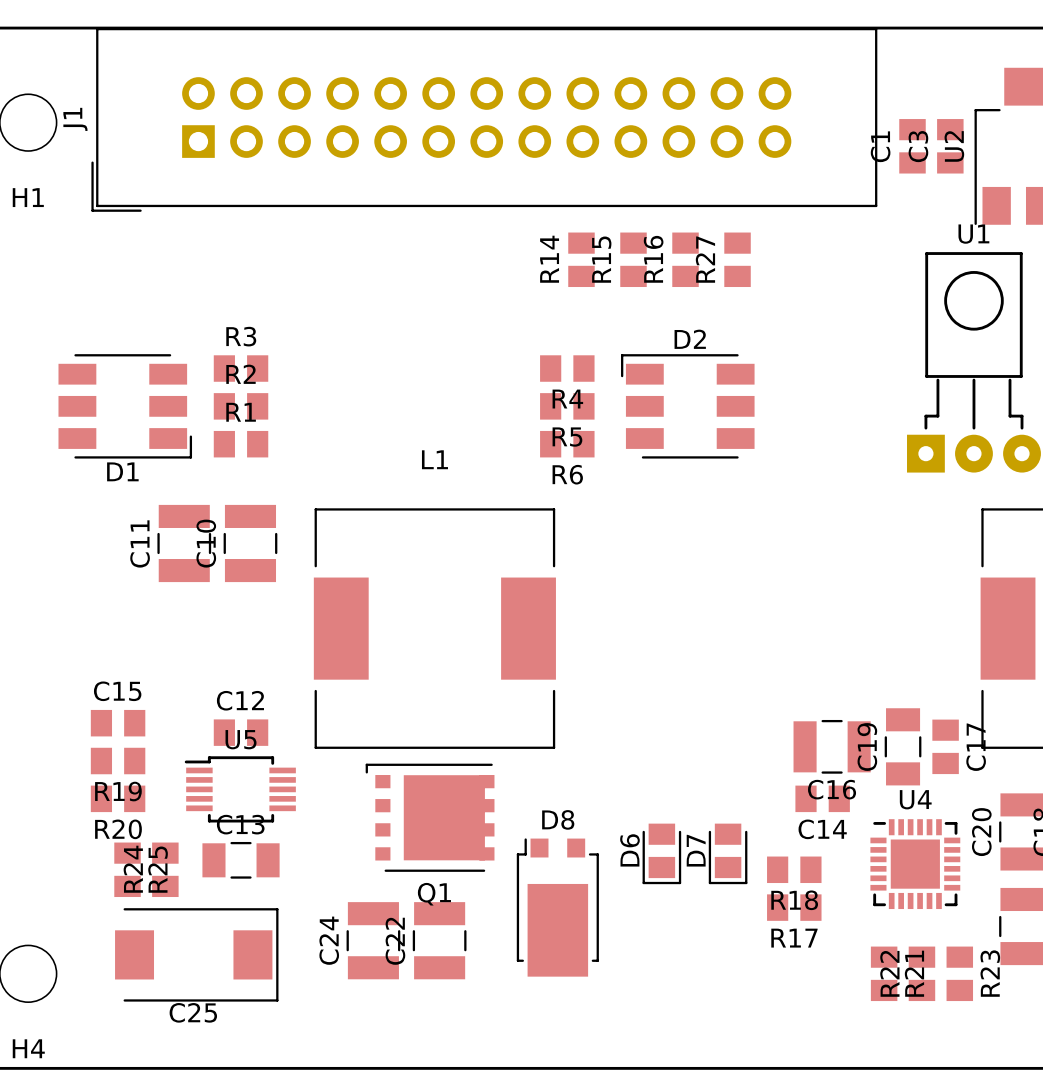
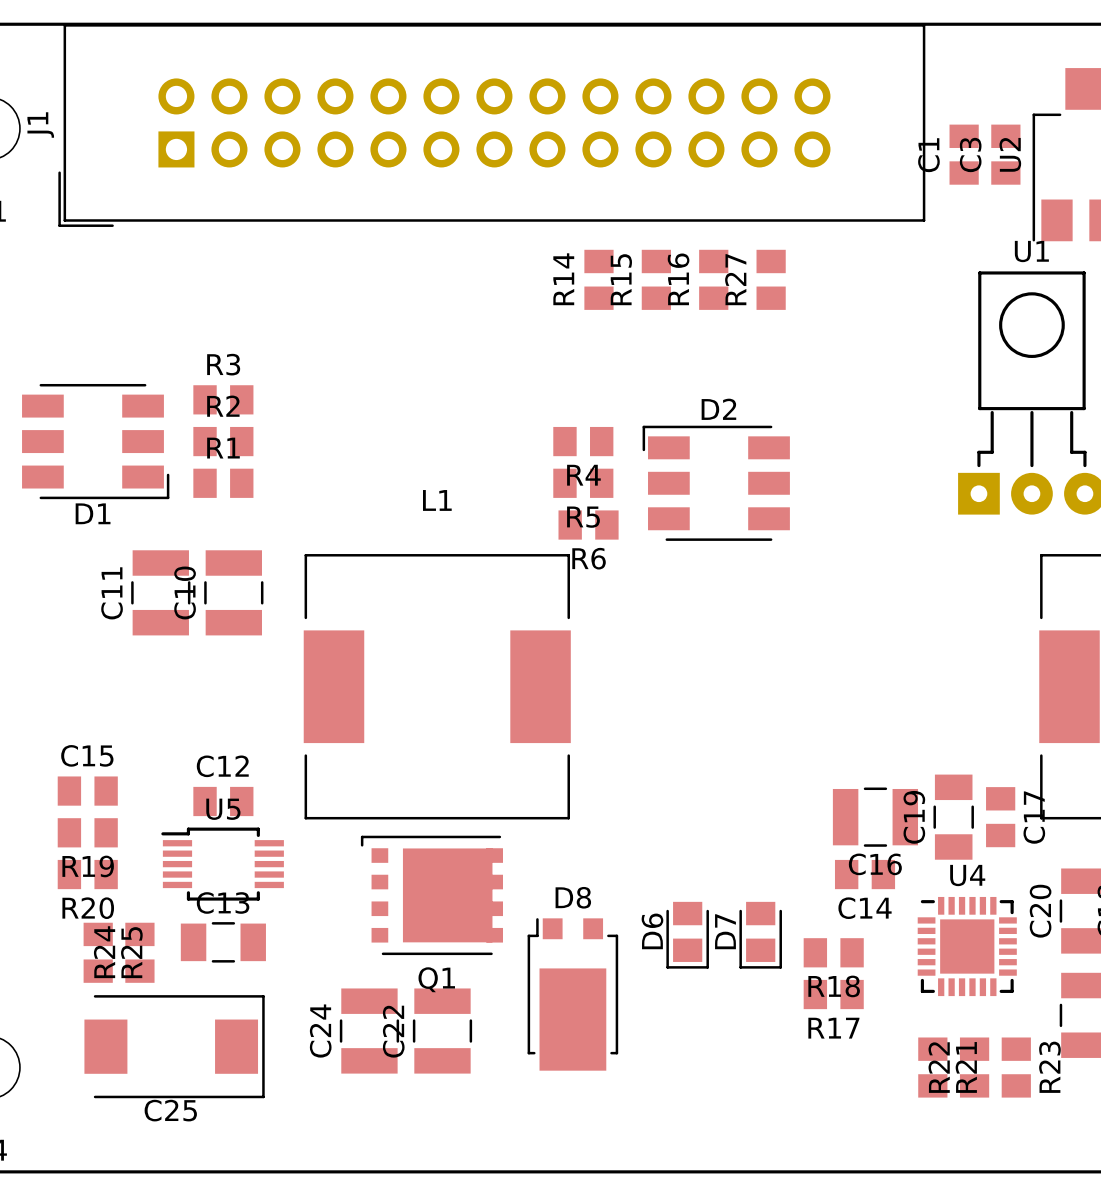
R4: (567, 368) -> none
D2 position: (687, 406) -> (716, 483)
R5 name: R5 (567, 437) -> R4 (583, 475)
R6 name: R6 (567, 474) -> R5 (583, 517)
R6: none -> (588, 525)

